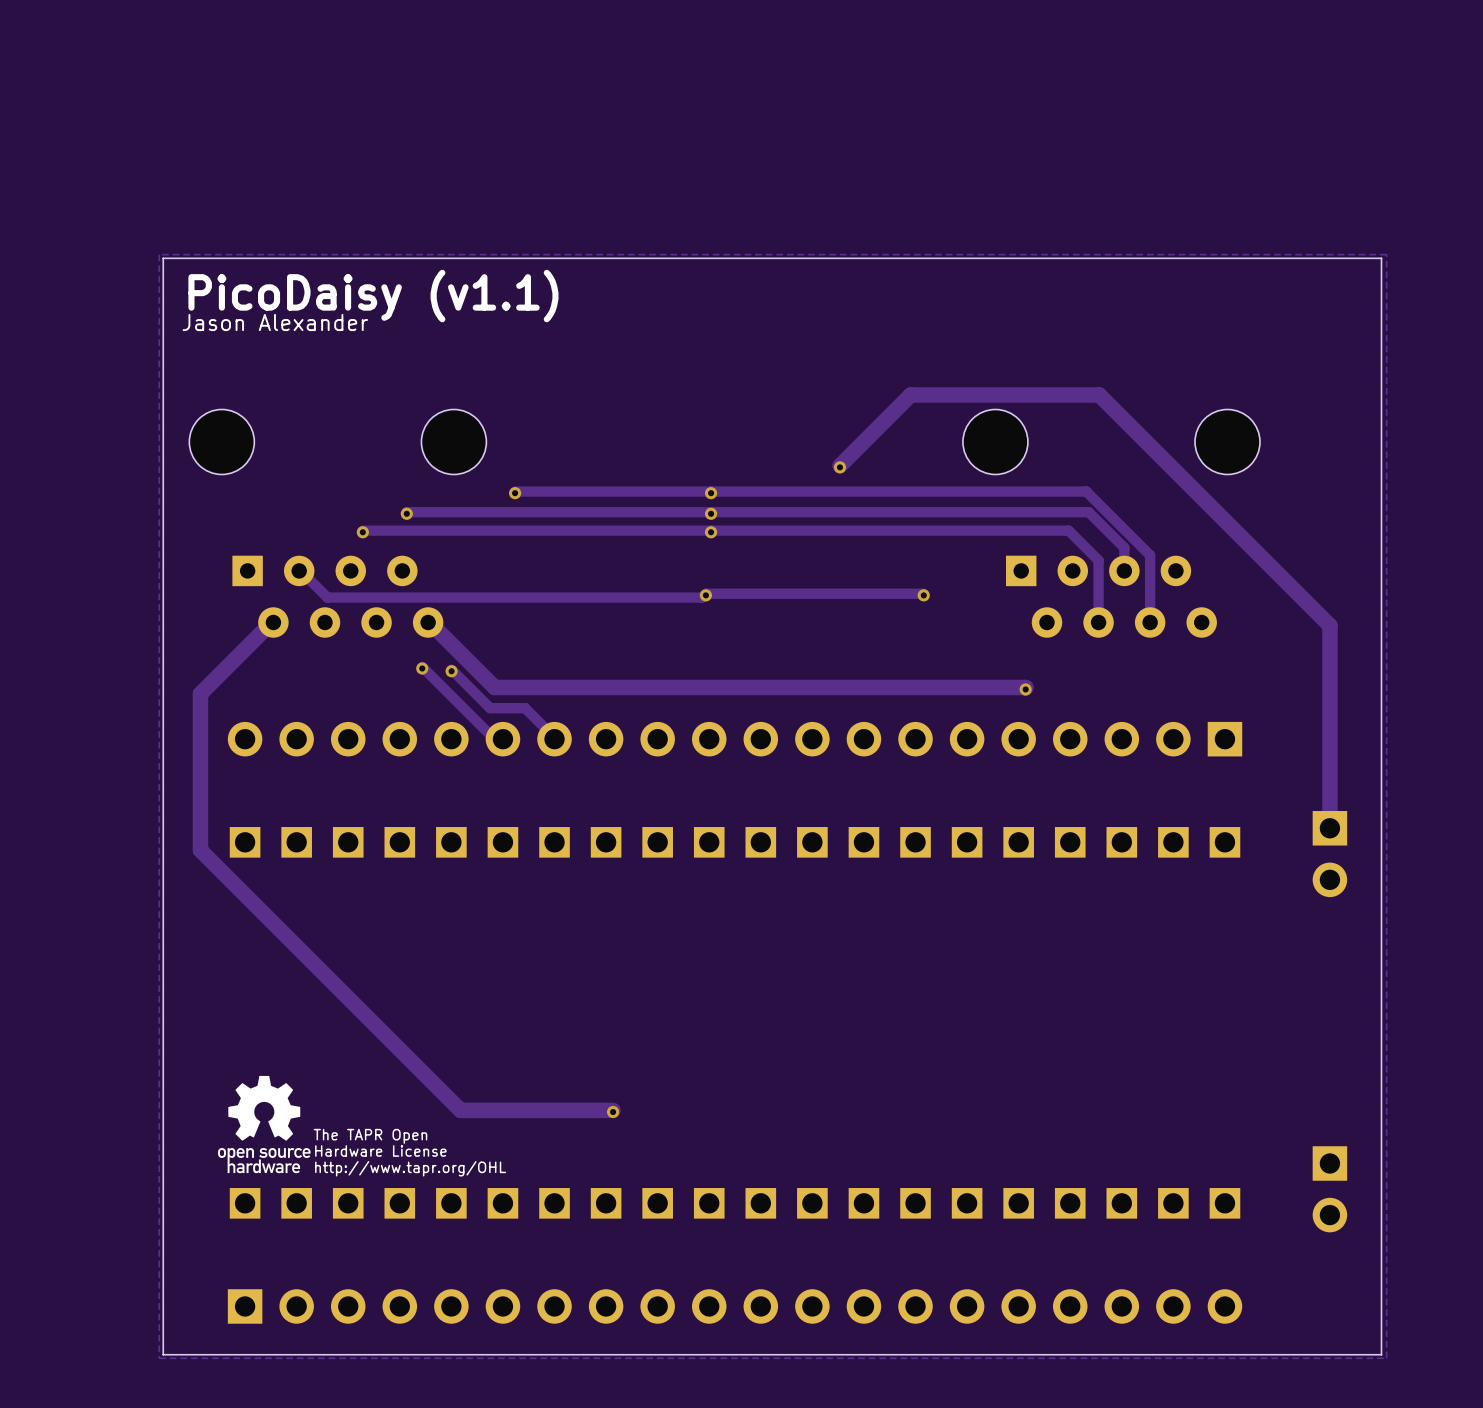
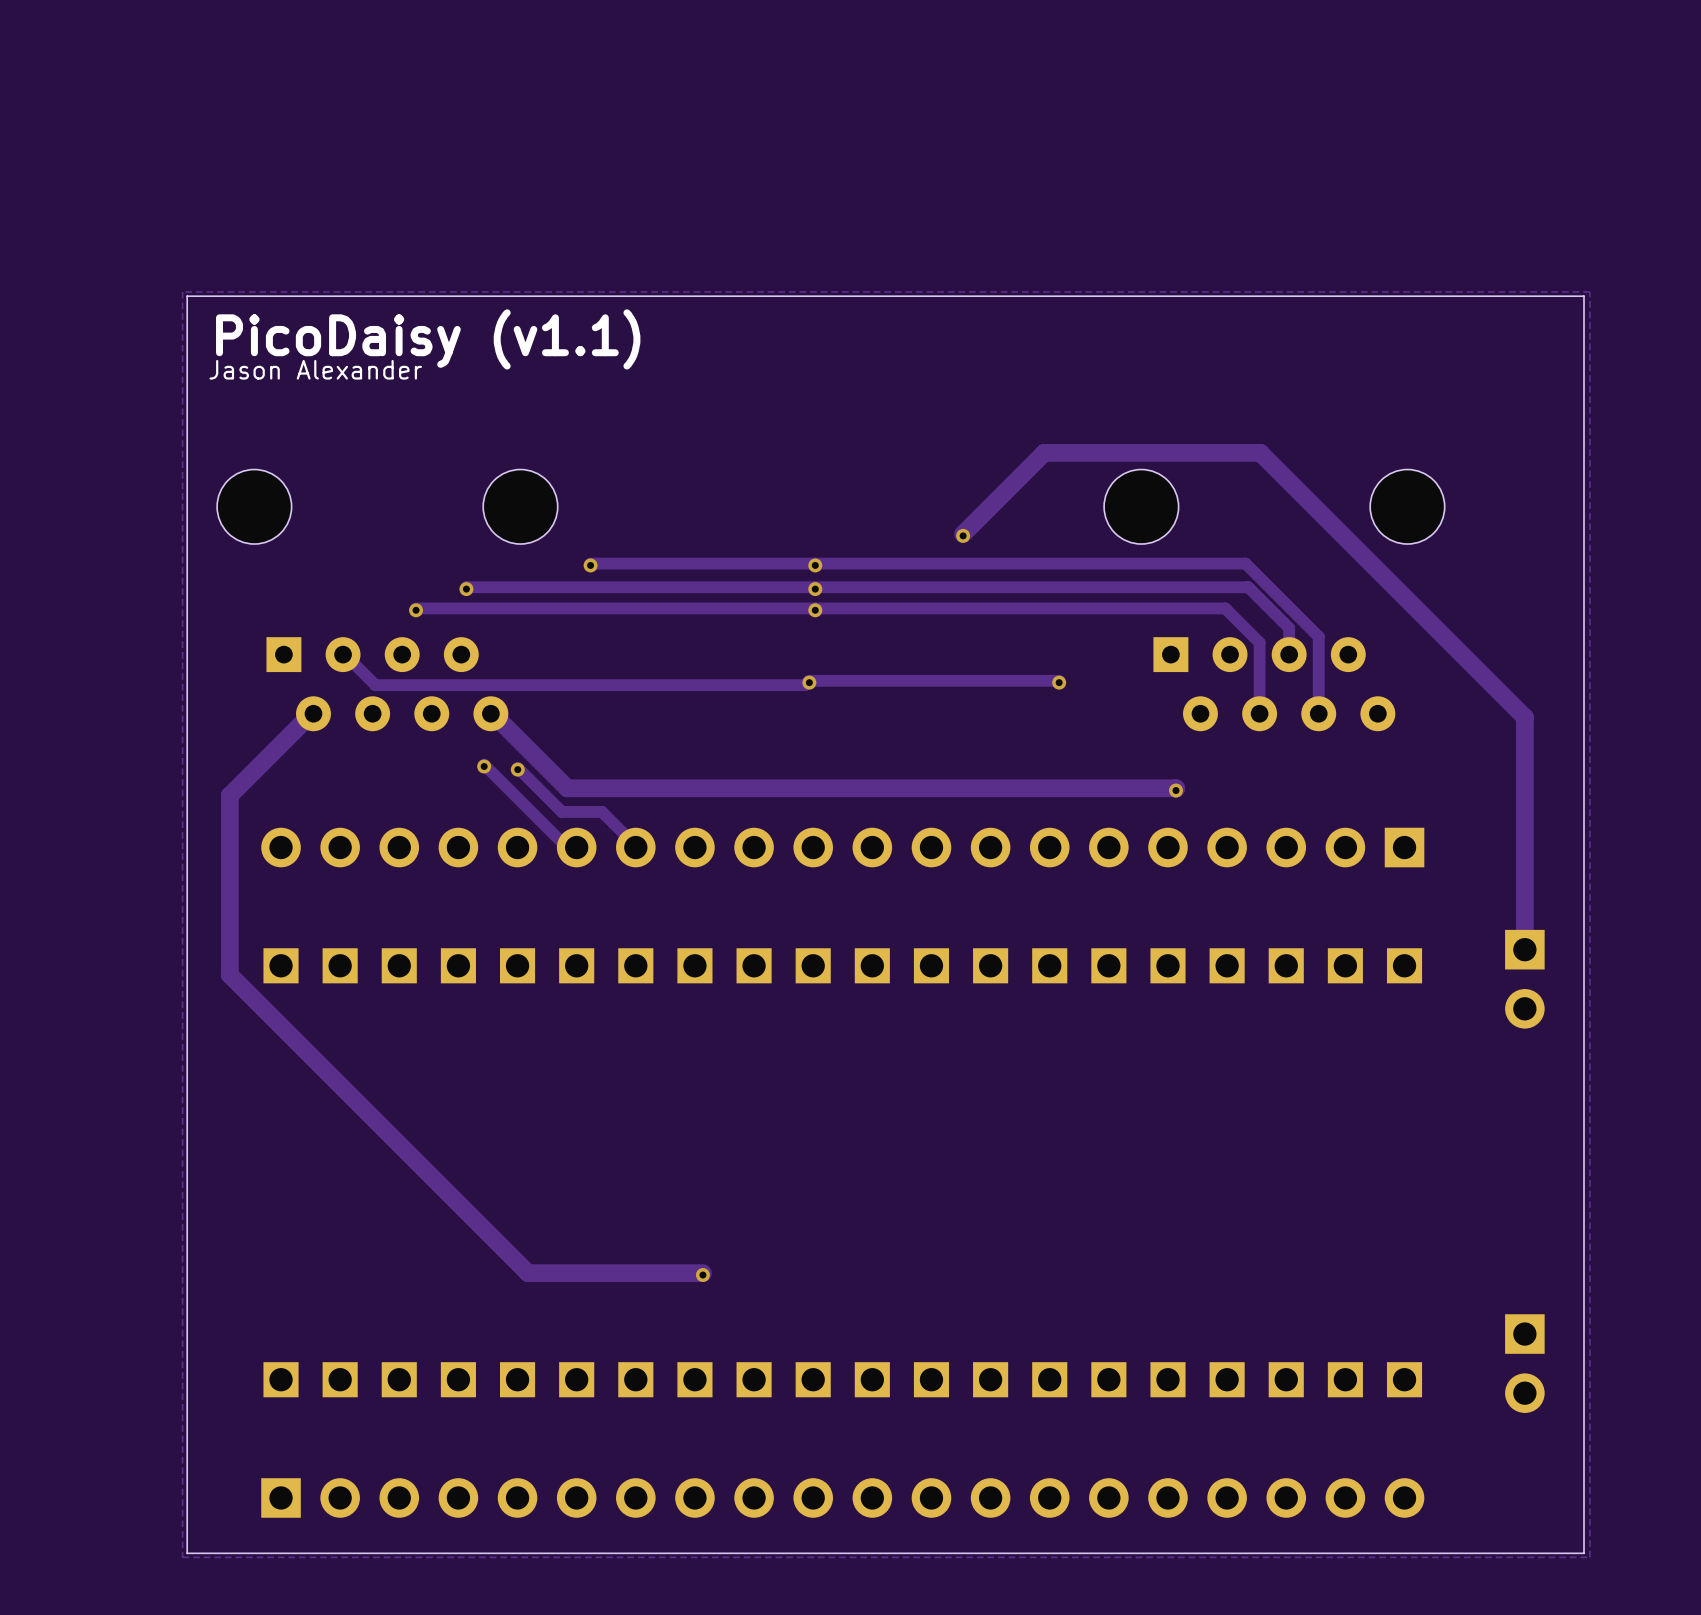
drawing: [218, 1075, 311, 1174] -> none
text: The TAPR Open (370, 1136) -> none
text: Hardware License (380, 1150) -> none
text: http://www.tapr.org/OHL (410, 1168) -> none

